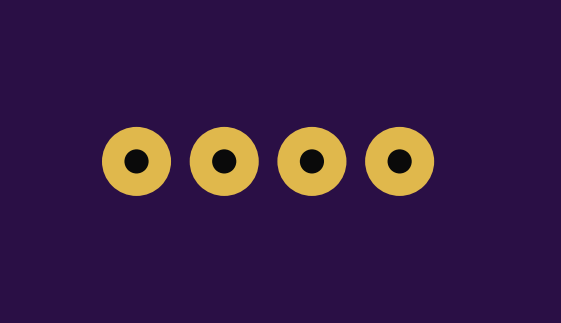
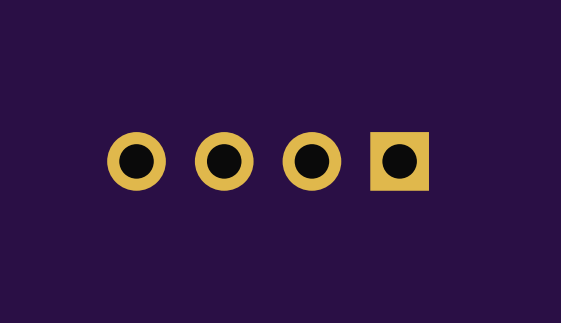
part footprint: [101, 126, 435, 196] -> [107, 132, 429, 191]

